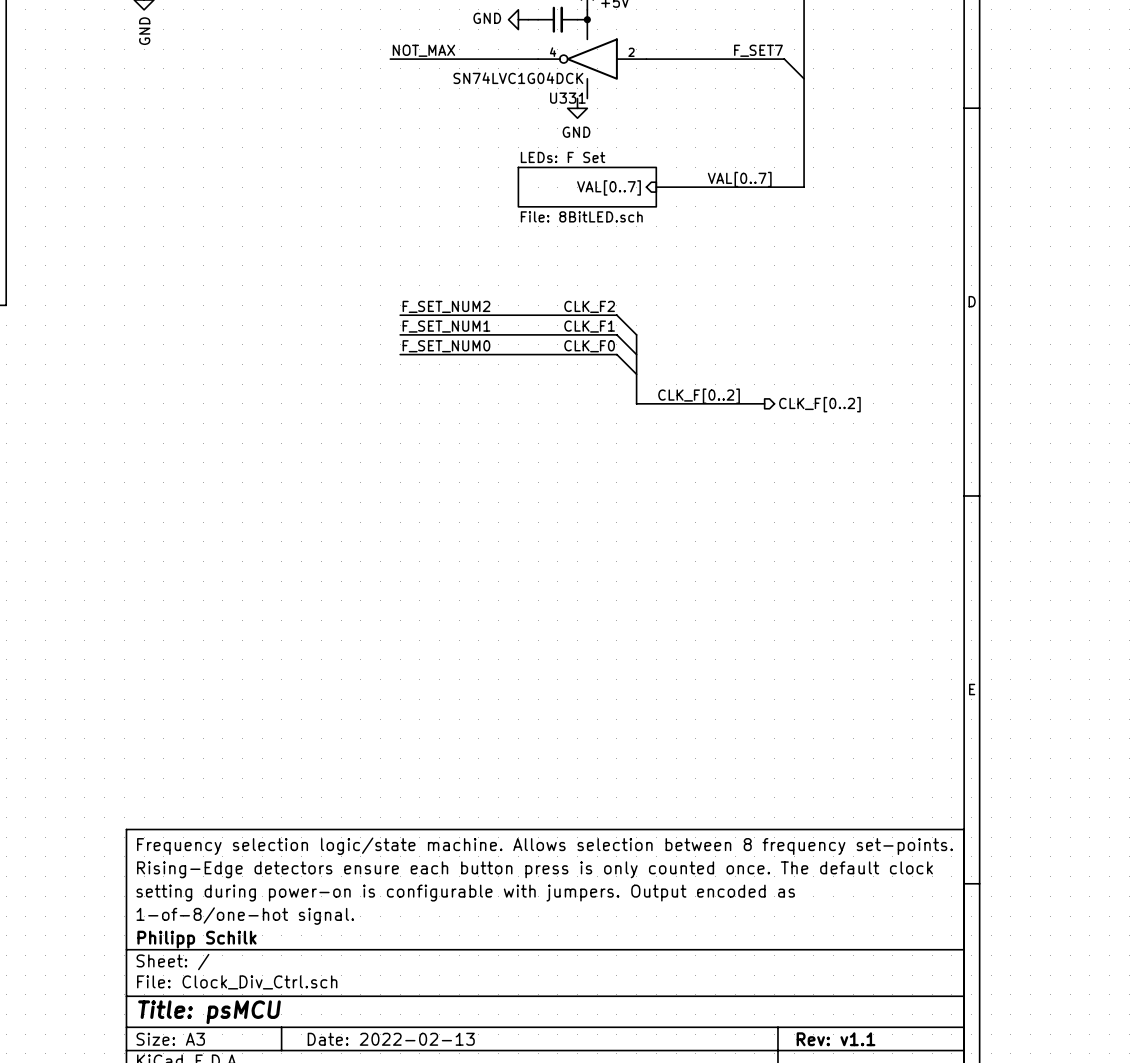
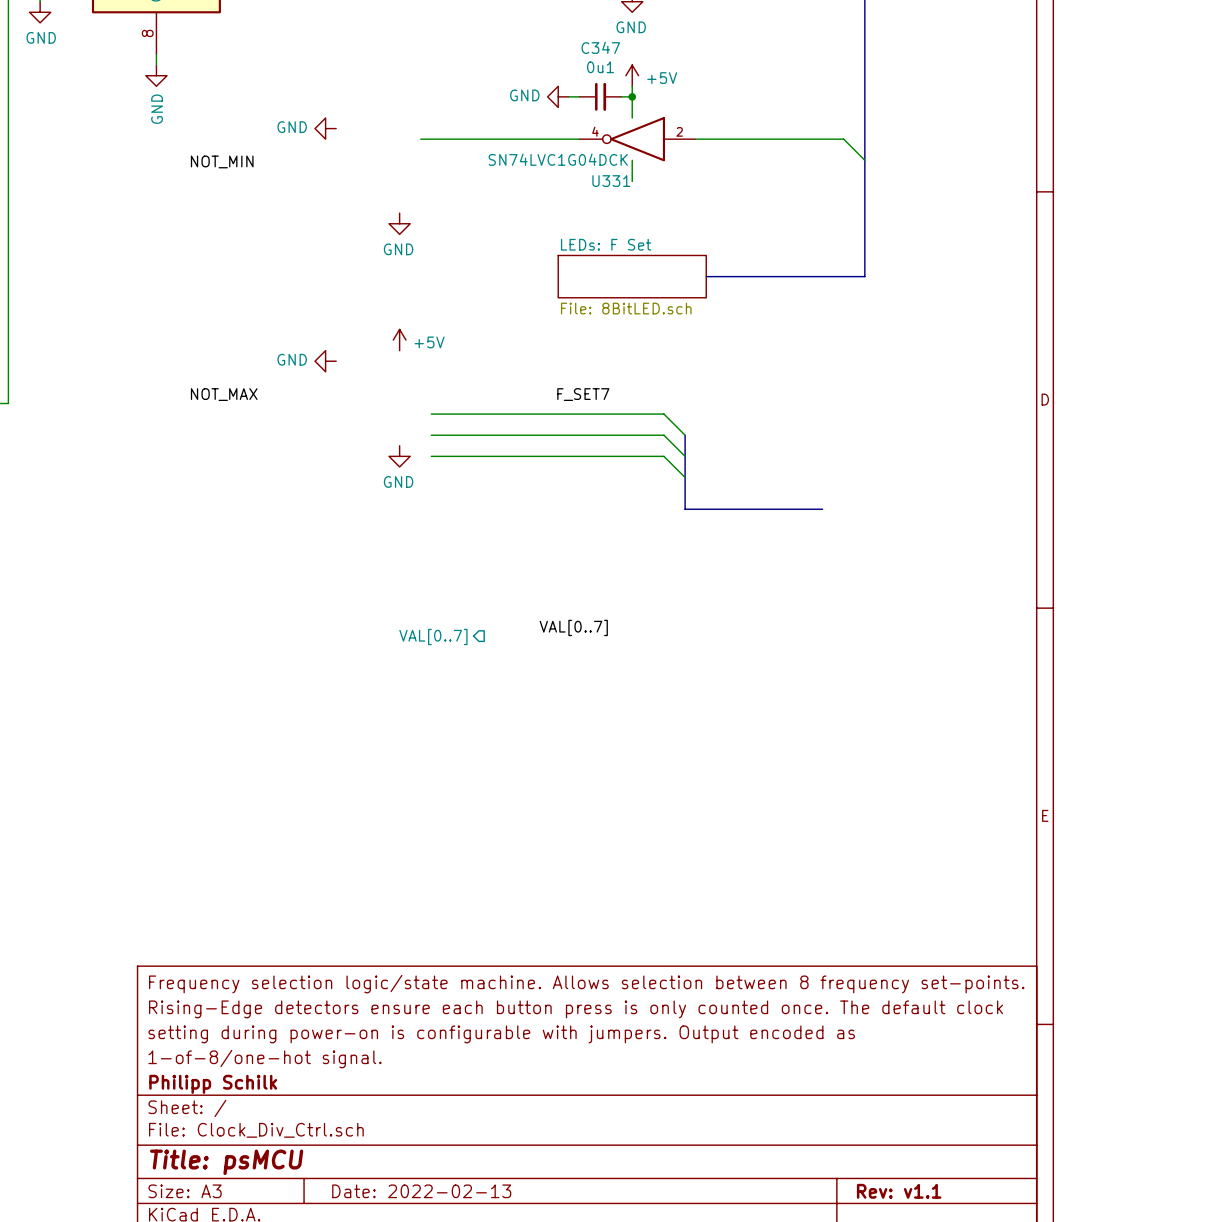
power symbol: none -> GND (325, 128)
label: NOT_MAX (423, 50) -> none
label: F_SET7 (758, 50) -> none
label: none -> NOT_MIN (222, 161)
power symbol: GND (577, 108) -> none
power symbol: none -> GND (399, 223)
label: VAL[0..7] (739, 179) -> none
sheet pin: VAL[0..7] (609, 187) -> none
power symbol: none -> +5V (399, 340)
power symbol: none -> GND (325, 361)
label: none -> NOT_MAX (224, 394)
label: none -> F_SET7 (583, 394)
label: F_SET_NUM2 (446, 306) -> none
label: CLK_F2 (589, 306) -> none
label: F_SET_NUM1 (446, 326) -> none
label: CLK_F1 (589, 326) -> none
label: F_SET_NUM0 (446, 346) -> none
label: CLK_F0 (589, 346) -> none
power symbol: none -> GND (399, 456)
label: CLK_F[0..2] (699, 396) -> none
hierarchical label: CLK_F[0..2] (819, 404) -> none
label: none -> VAL[0..7] (573, 627)
sheet pin: none -> VAL[0..7] (433, 636)

